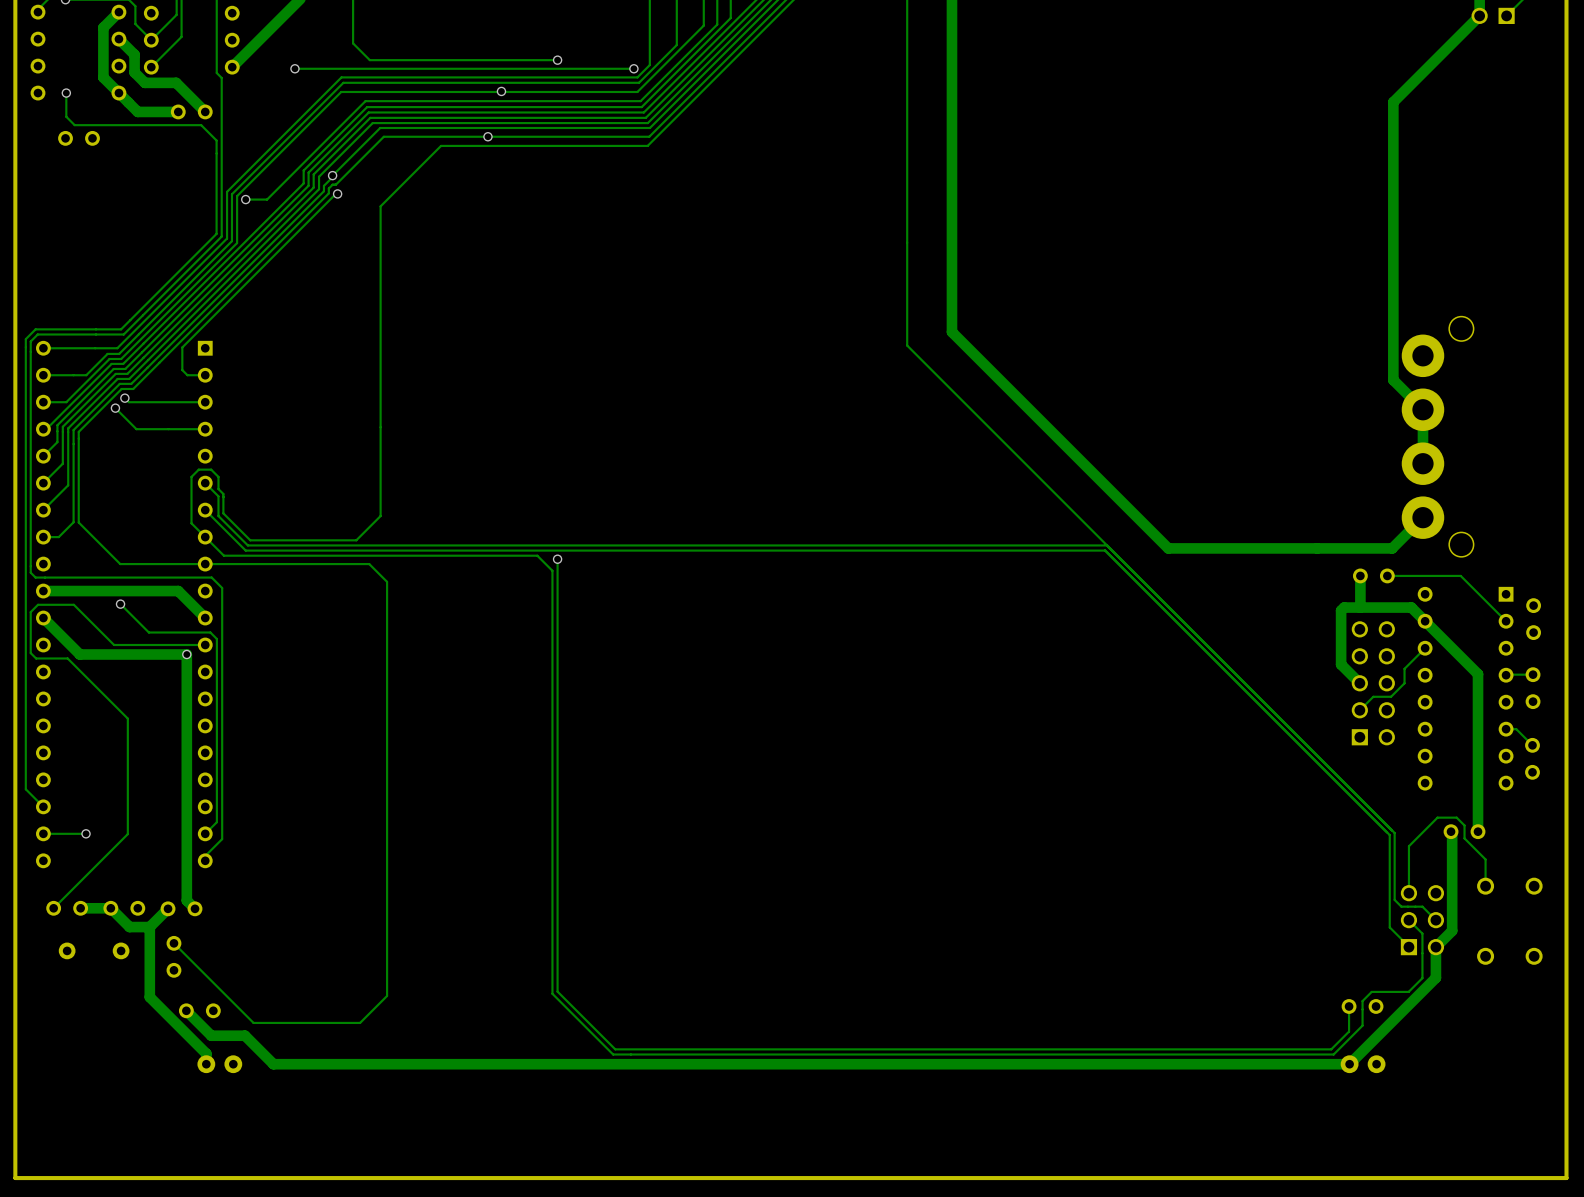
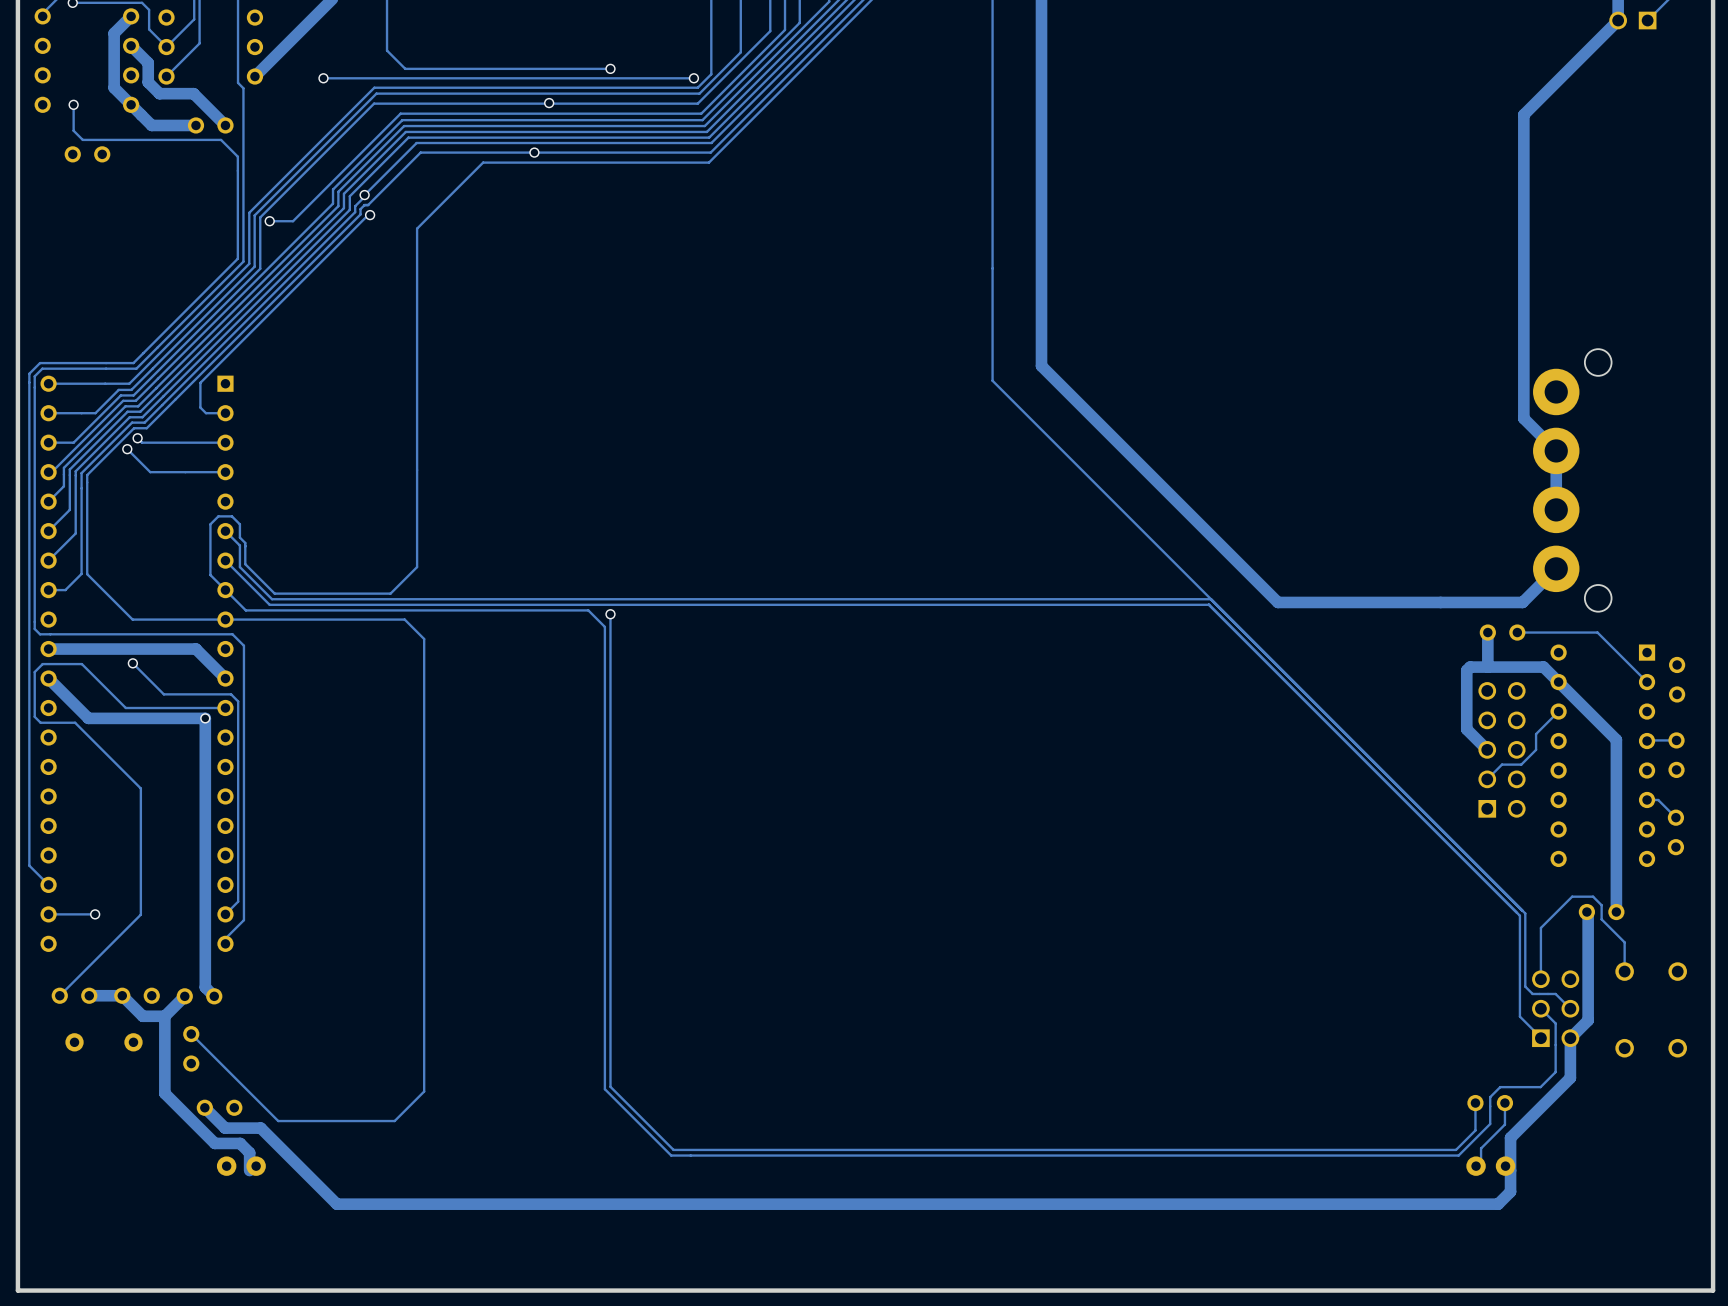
track: (1435, 977) (1349, 1064) (273, 1064) (245, 1035) (211, 1035) (204, 1029) -> (1570, 1071) (1570, 1077) (1510, 1137) (1510, 1191) (1498, 1204) (336, 1204) (260, 1128) (225, 1128)
track: (149, 997) (206, 1053) (206, 1064) -> (164, 1092) (214, 1143) (240, 1143) (249, 1152) (249, 1170)
track: none -> (1504, 1103) (1504, 1124) (1481, 1148) (1481, 1170)

